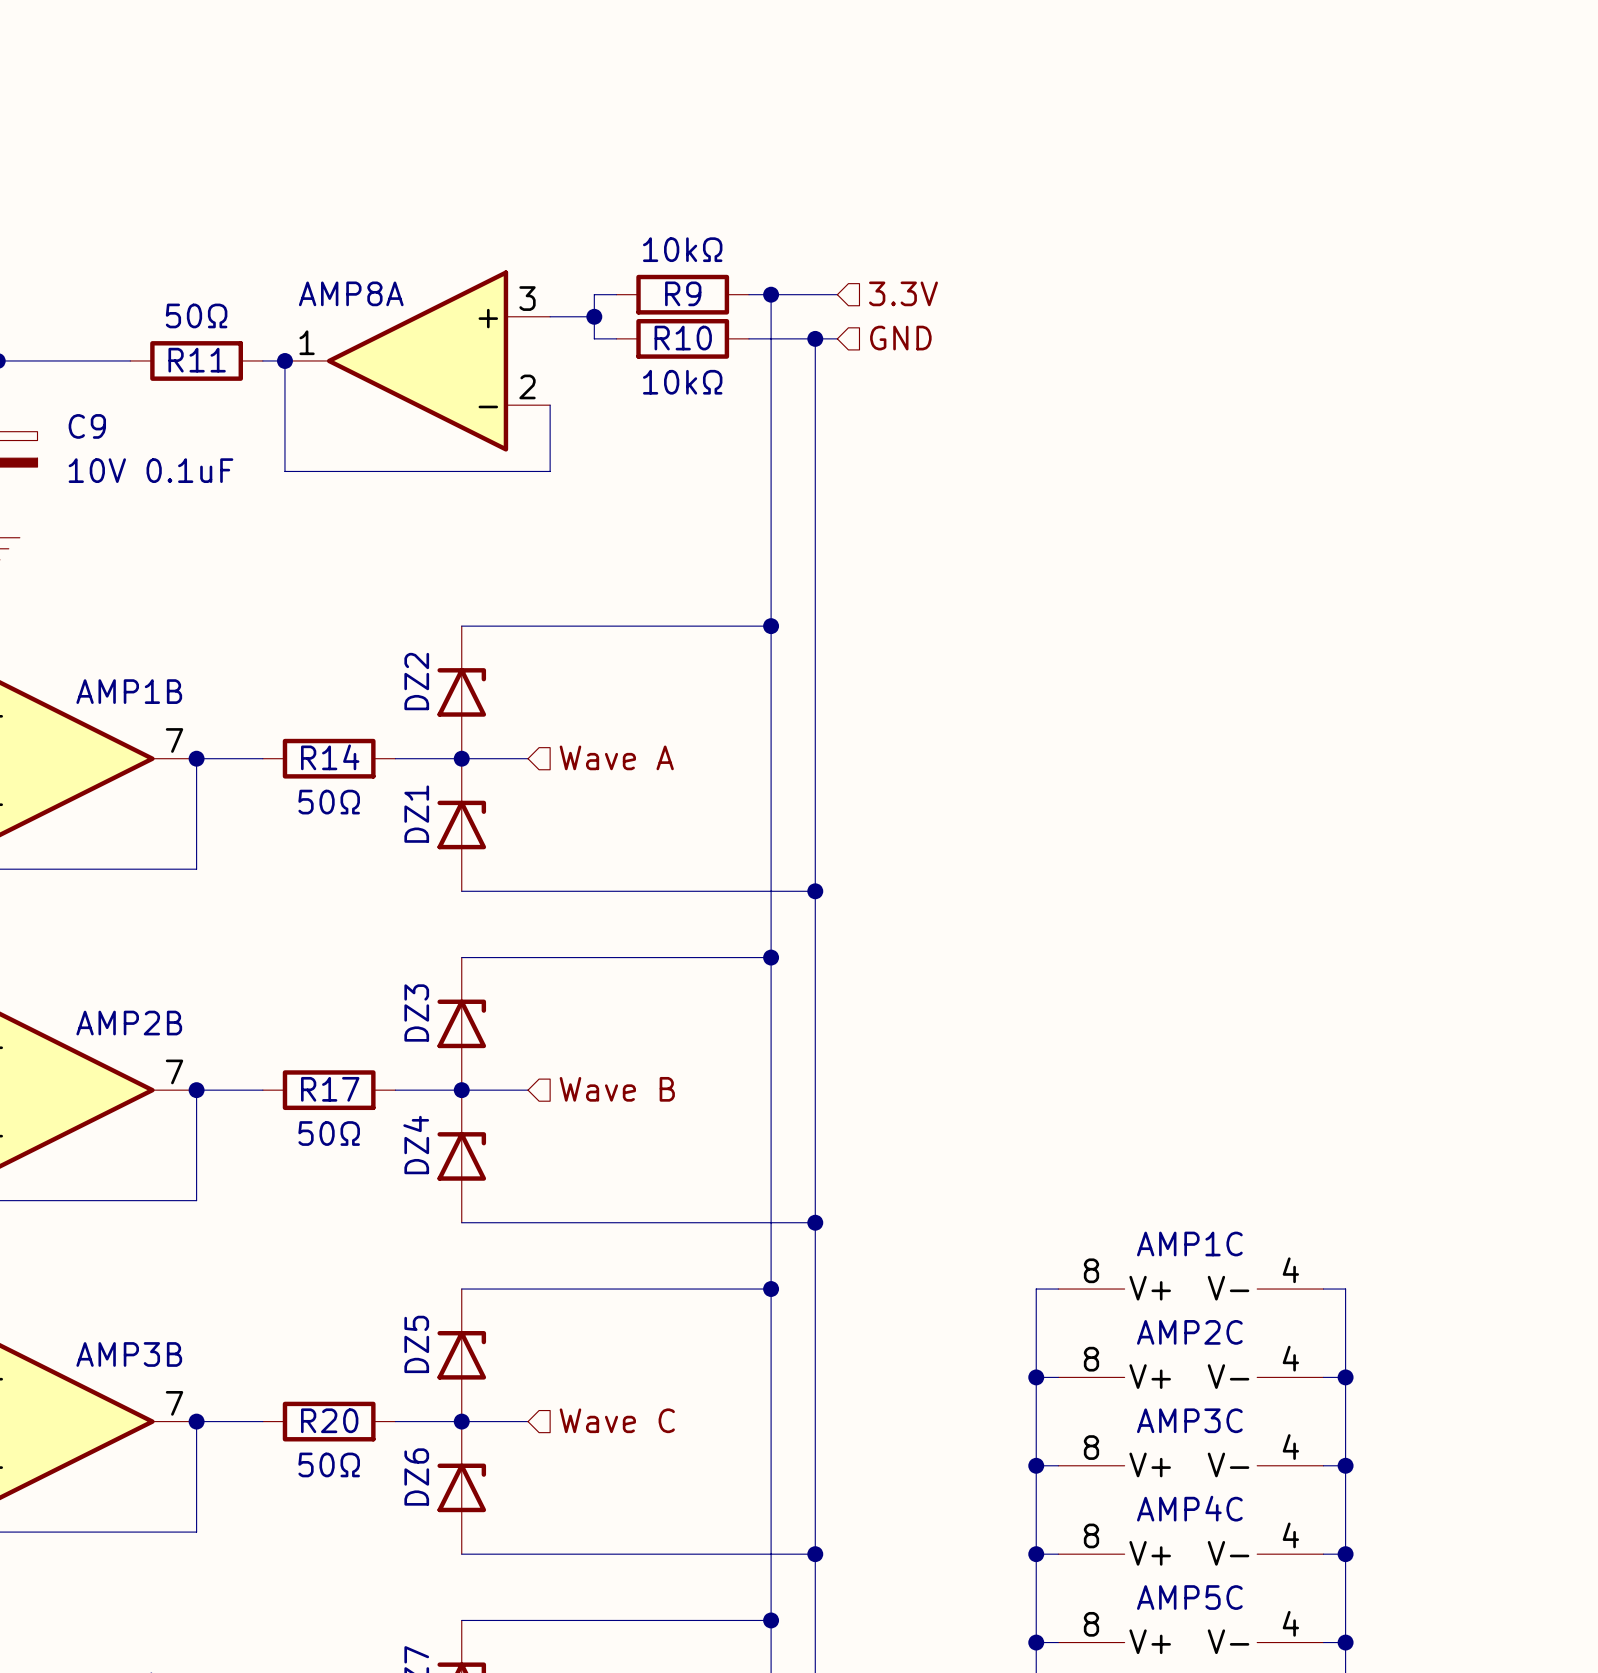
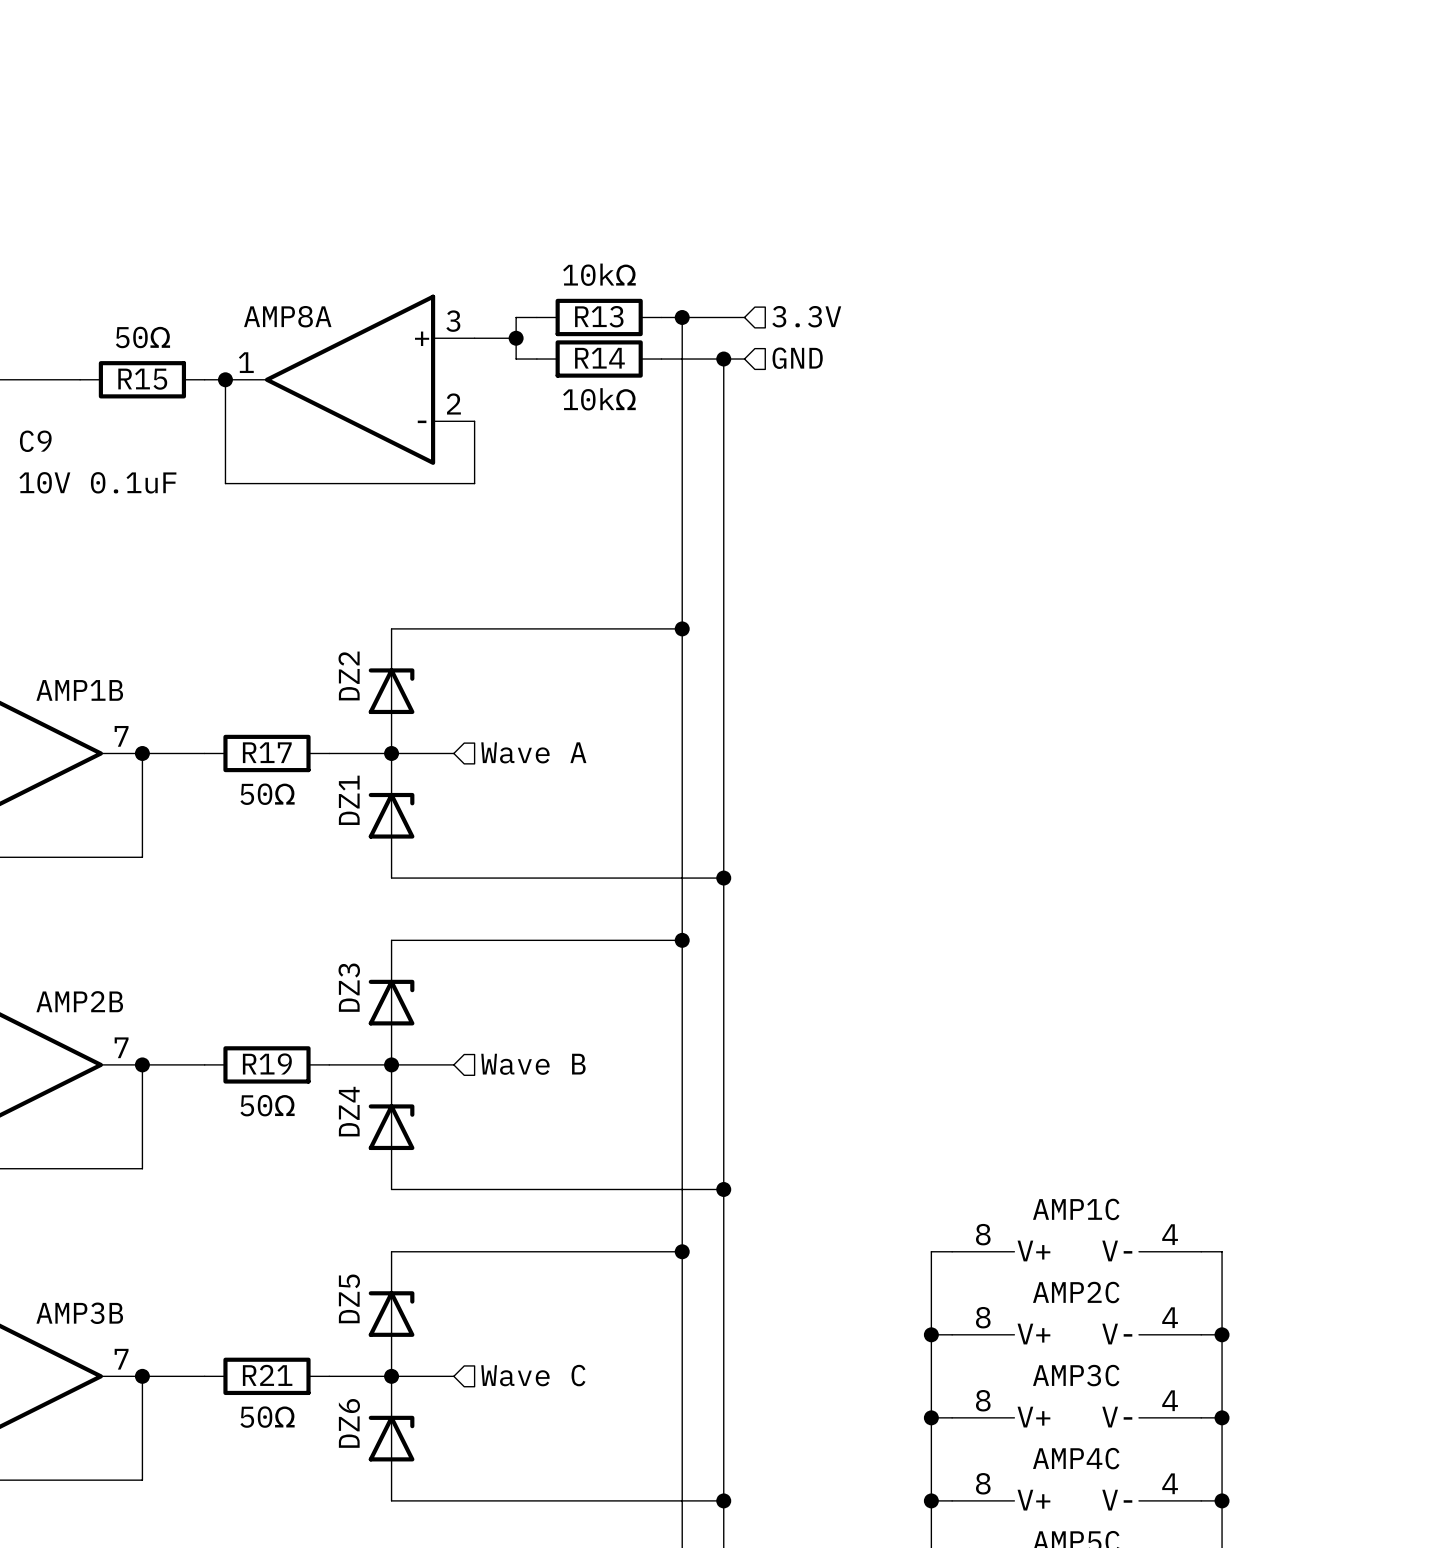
R9 name: R9 (683, 293) -> R13 (599, 316)
R10 name: R10 (683, 338) -> R14 (599, 358)
R11 name: R11 (197, 360) -> R15 (142, 379)
R14 name: R14 (330, 757) -> R17 (267, 752)
R17 name: R17 (330, 1089) -> R19 (267, 1063)
R20 name: R20 (329, 1420) -> R21 (267, 1375)

